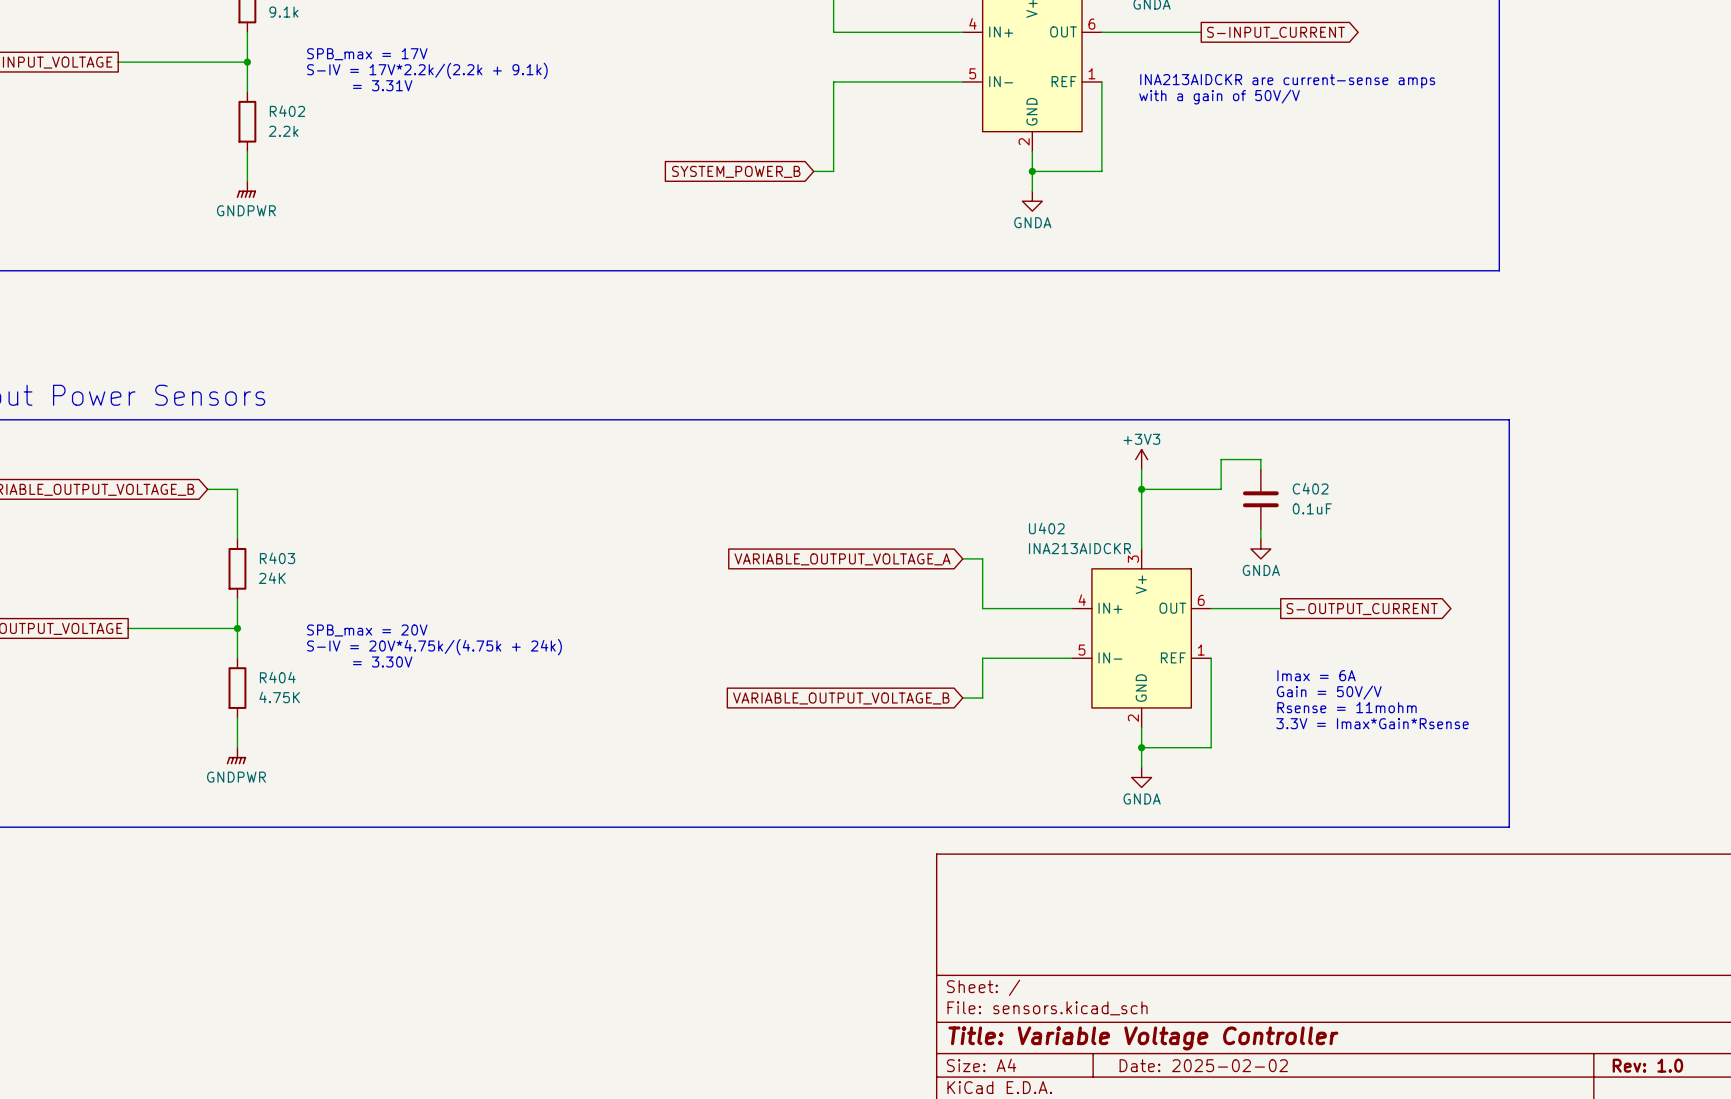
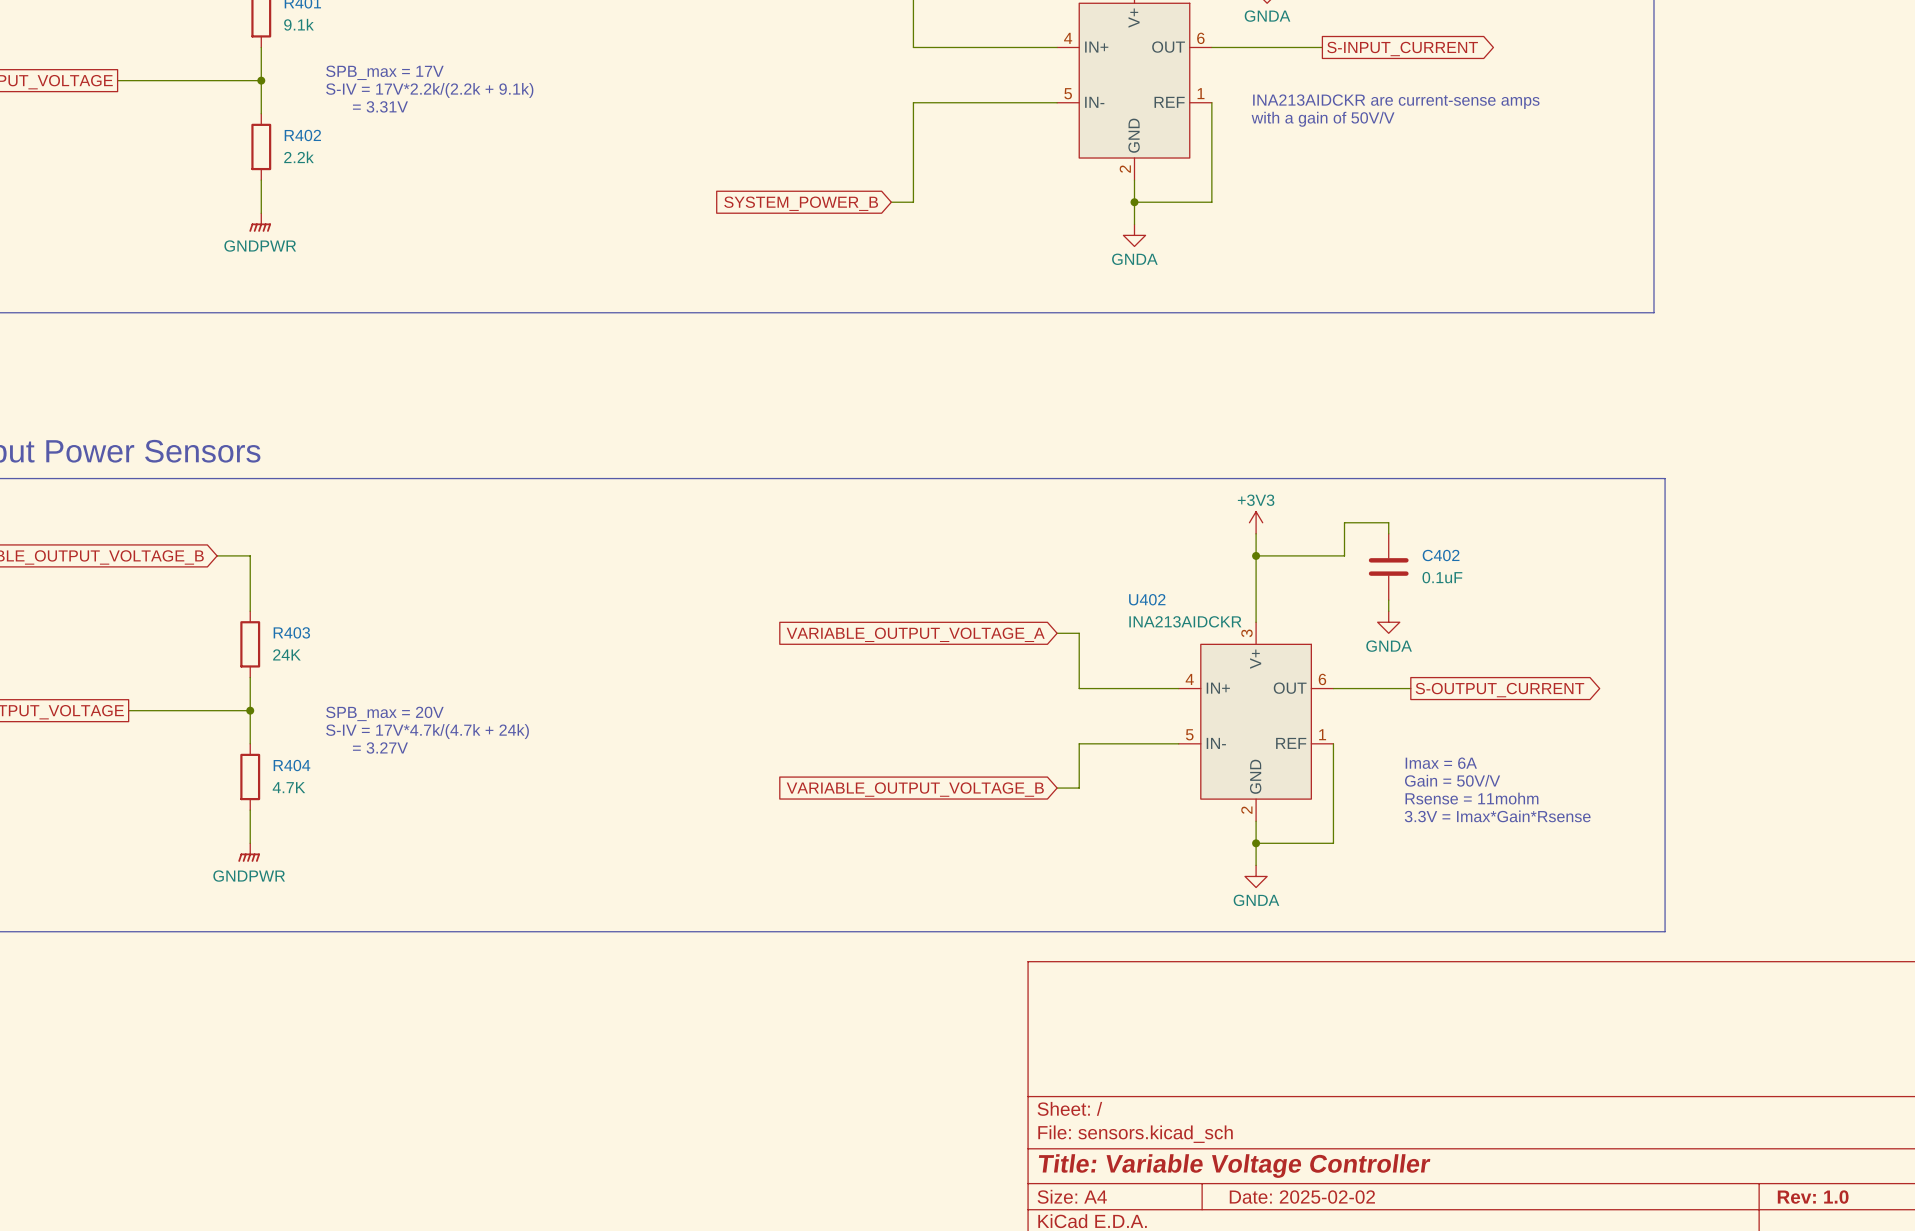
text: S-IV = 20V*4.75k/(4.75k + 24k) (434, 647) -> S-IV = 17V*4.7k/(4.7k + 24k) (427, 731)
text: = 3.30V (382, 662) -> = 3.27V (380, 747)
R404 value: 4.75K (279, 697) -> 4.7K (288, 787)

